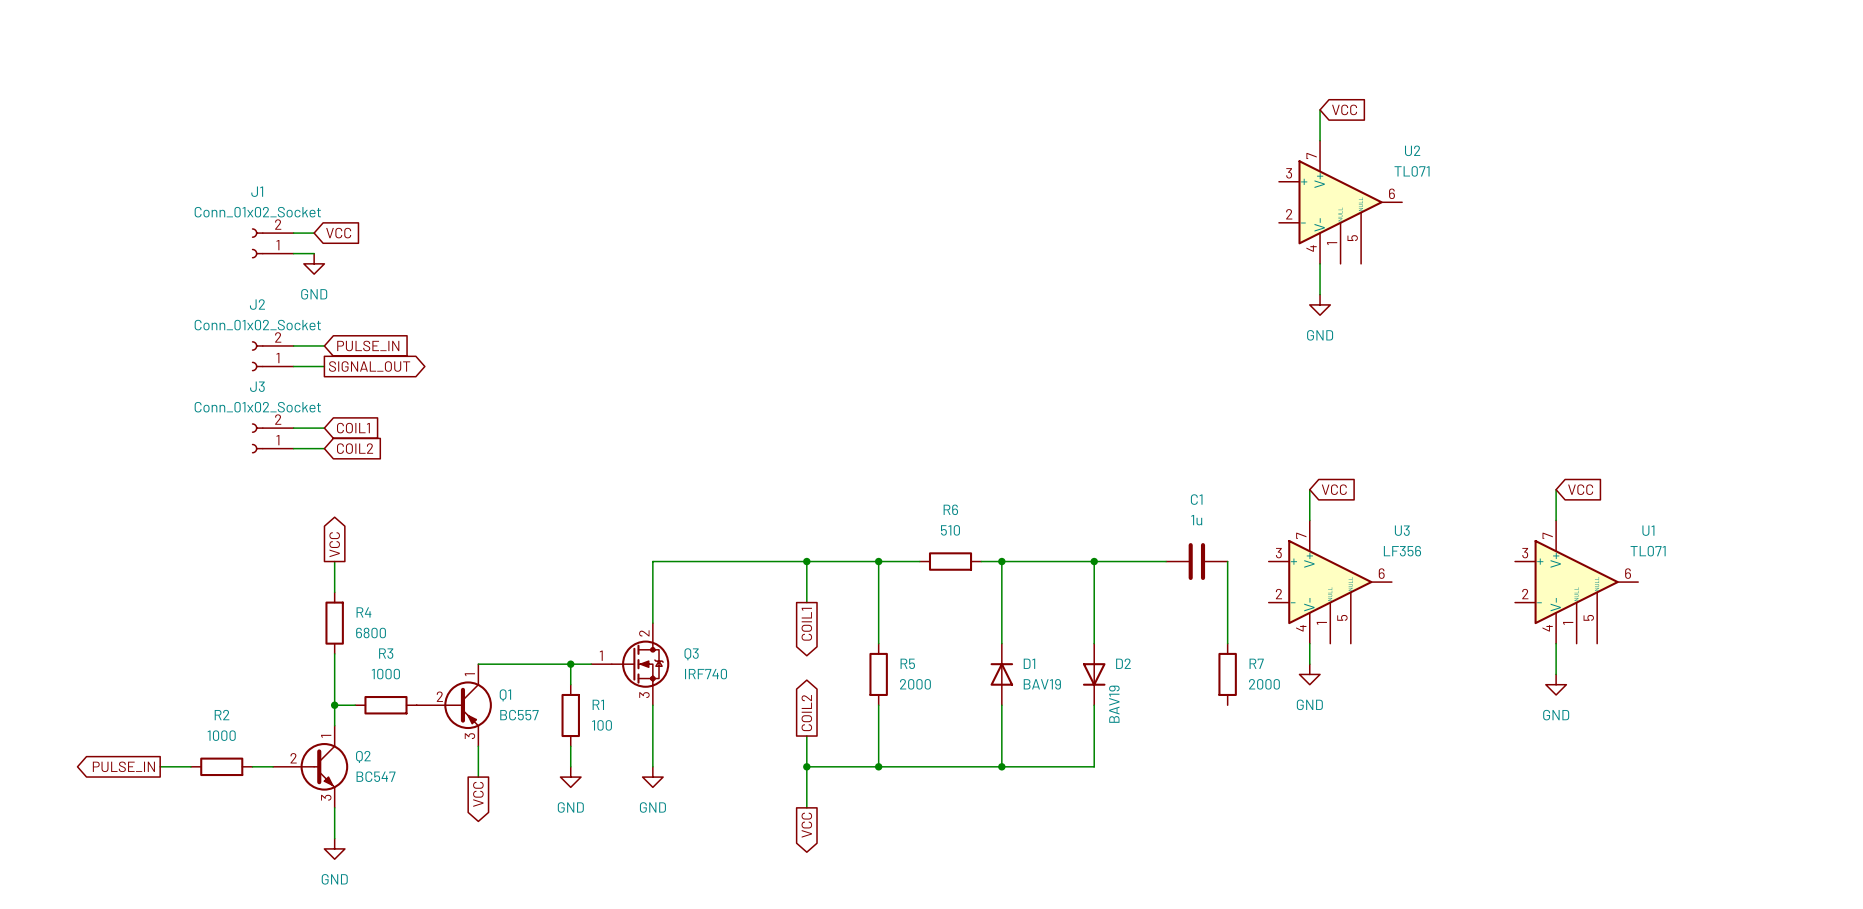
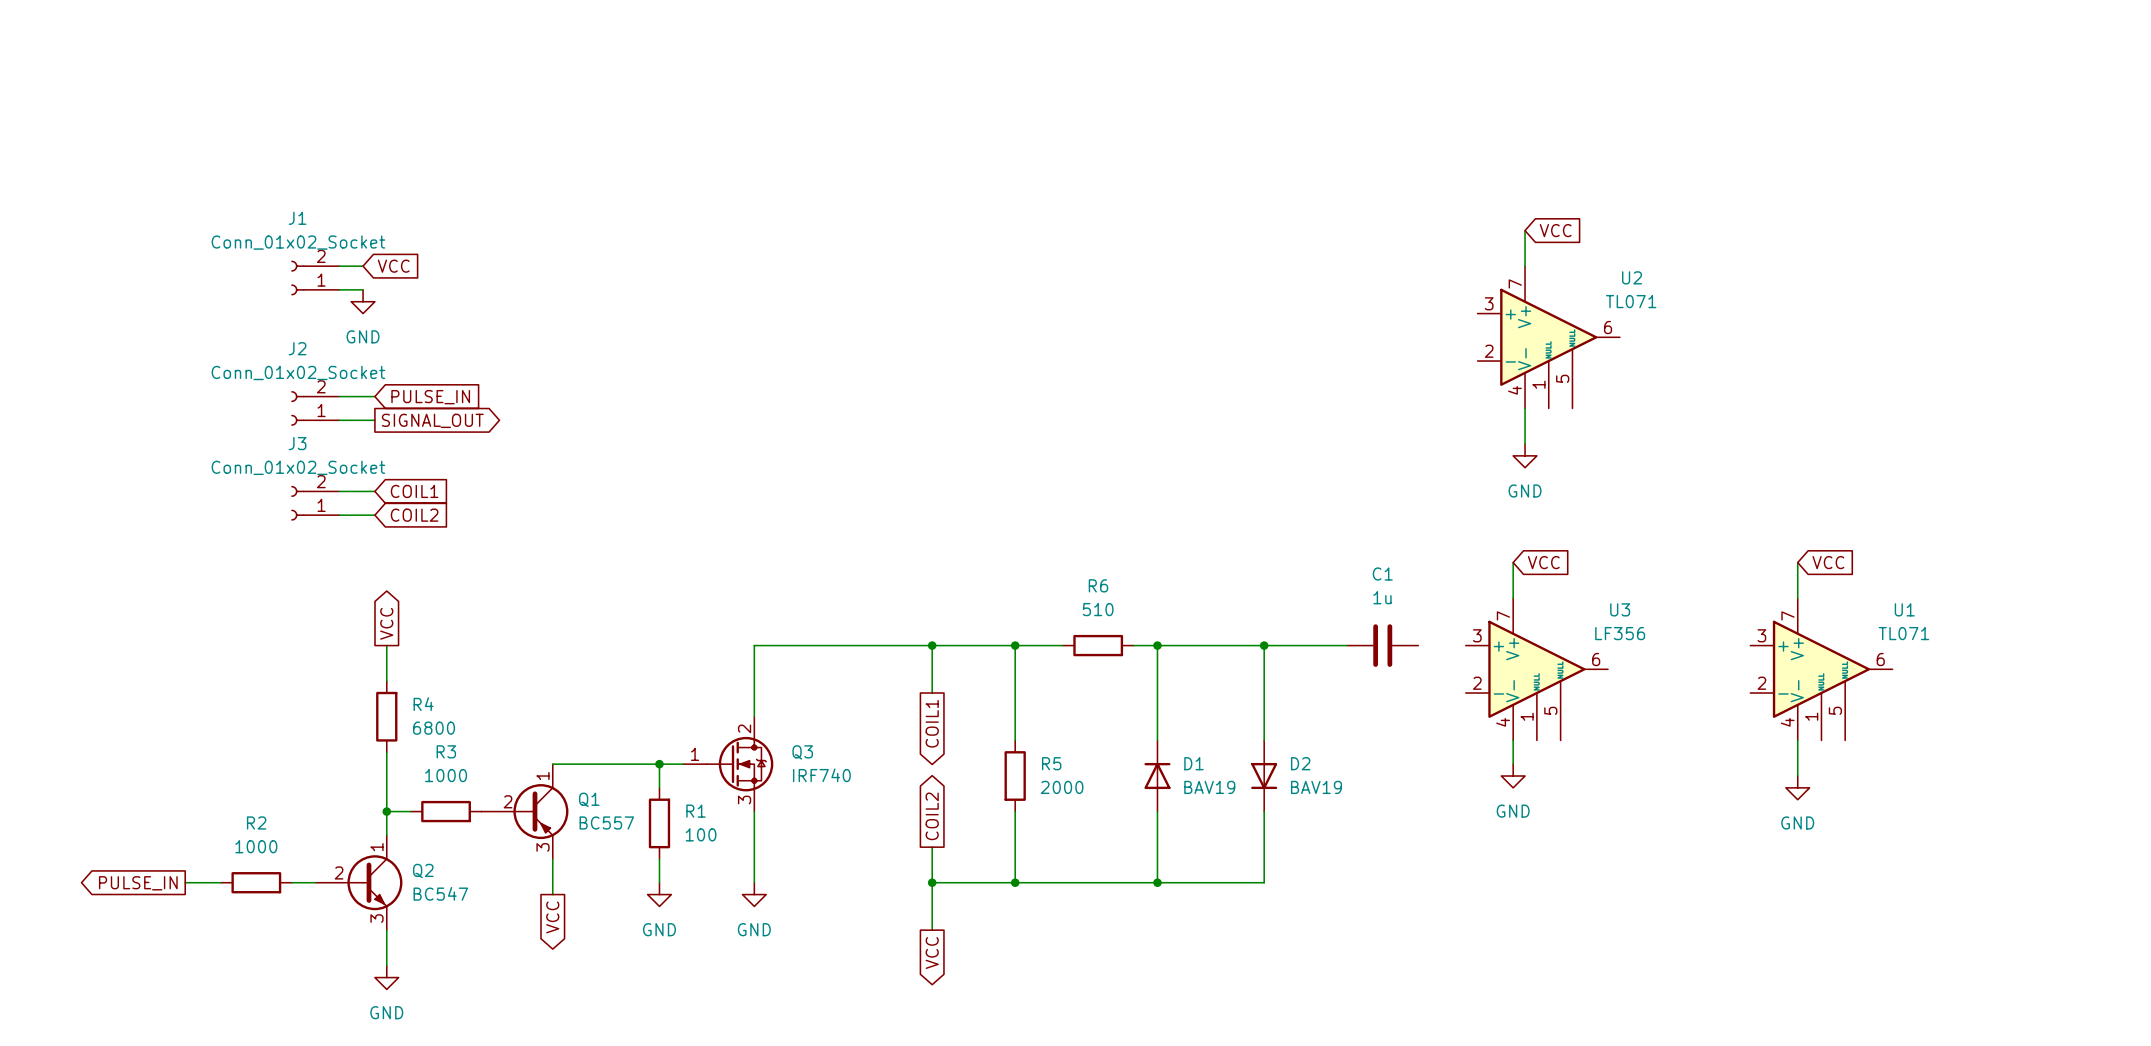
wire: (1320, 109) (1320, 140) -> none
global label position: VCC (1344, 109) -> VCC (1555, 230)
U2 position: (1340, 202) -> (1548, 337)
power symbol position: GND (1320, 304) -> GND (1525, 455)
wire: none -> (1525, 408) (1525, 444)
wire: (1227, 561) (1227, 643) -> none
R7: 2000 (1227, 674) -> none
D2 value rotation: 0° (1114, 704) -> 90° clockwise (1316, 787)

